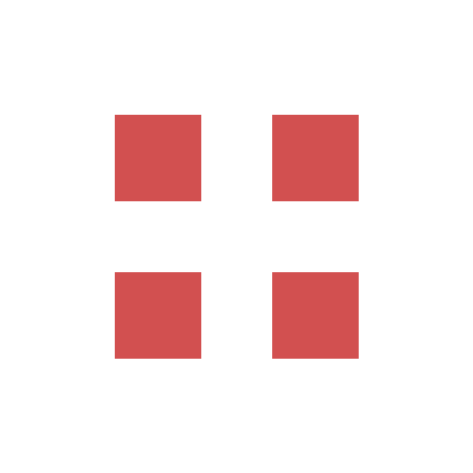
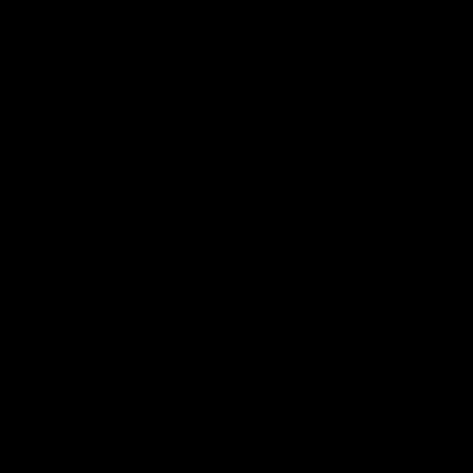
part: (158, 158) -> none
part: (315, 158) -> none
part: (158, 315) -> none
part: (315, 315) -> none

